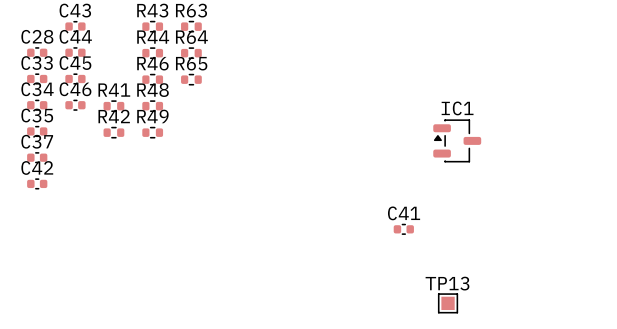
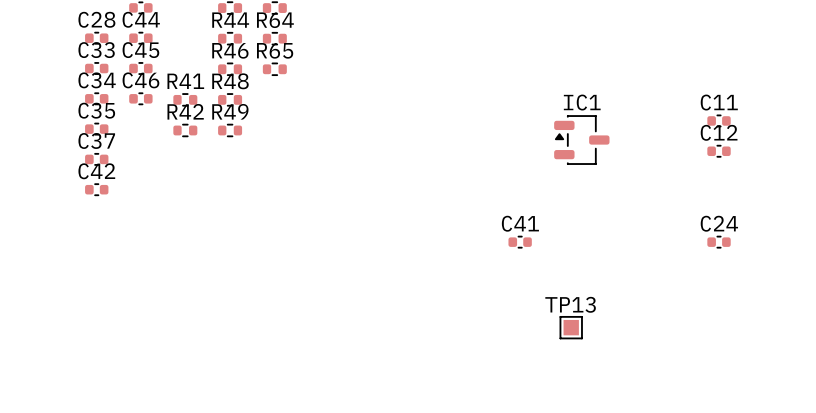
C11: none -> (719, 120)
C12: none -> (719, 151)
C24: none -> (719, 242)

